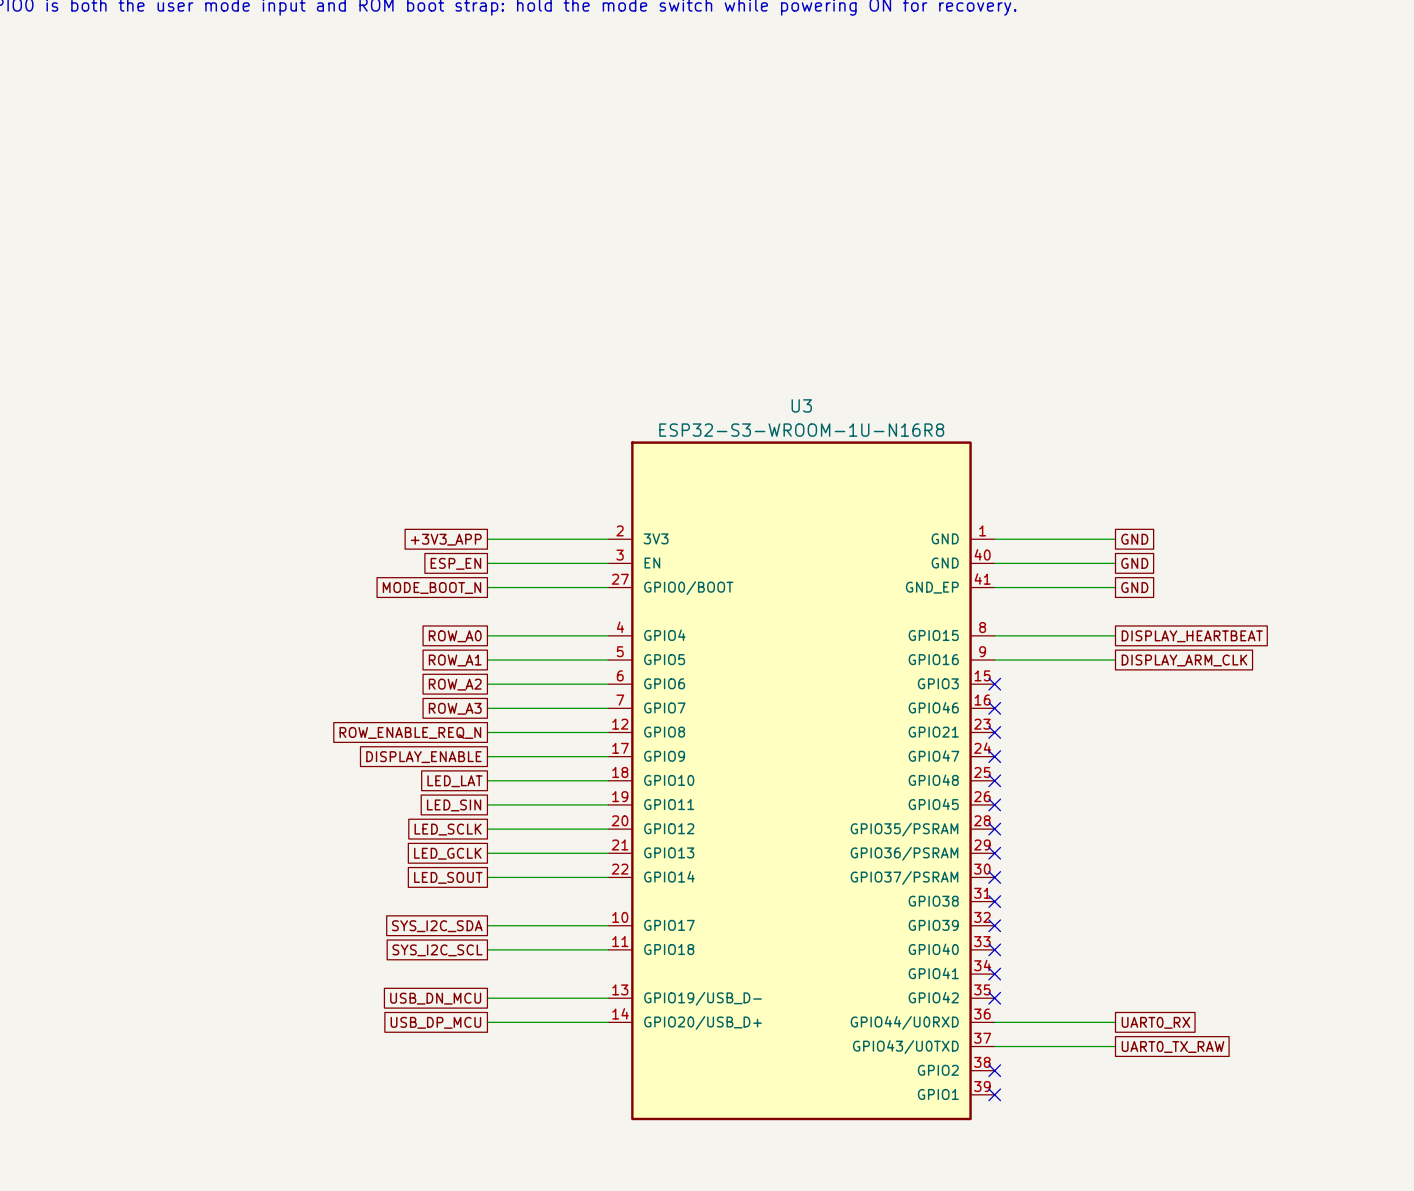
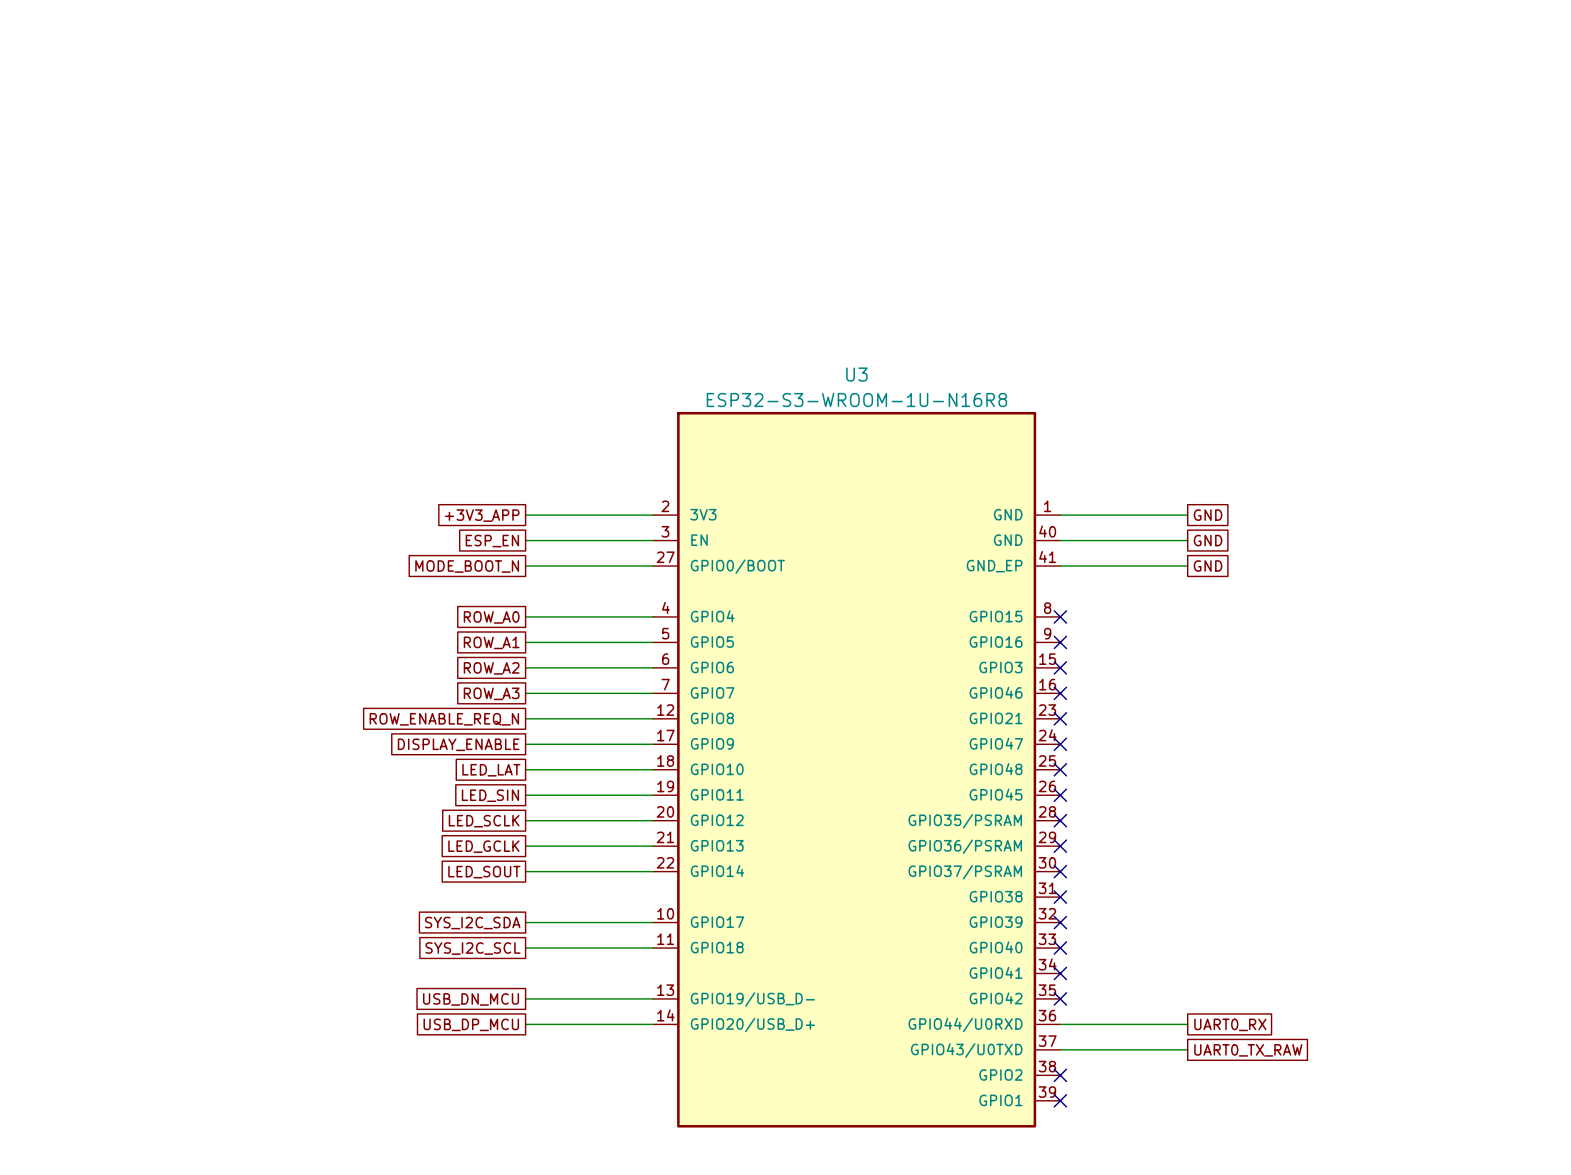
wire: (994, 635) (1115, 635) -> none
no-connect mark: none -> (1060, 616)
global label: DISPLAY_HEARTBEAT (1192, 636) -> none
wire: (994, 660) (1115, 660) -> none
no-connect mark: none -> (1060, 642)
global label: DISPLAY_ARM_CLK (1184, 660) -> none

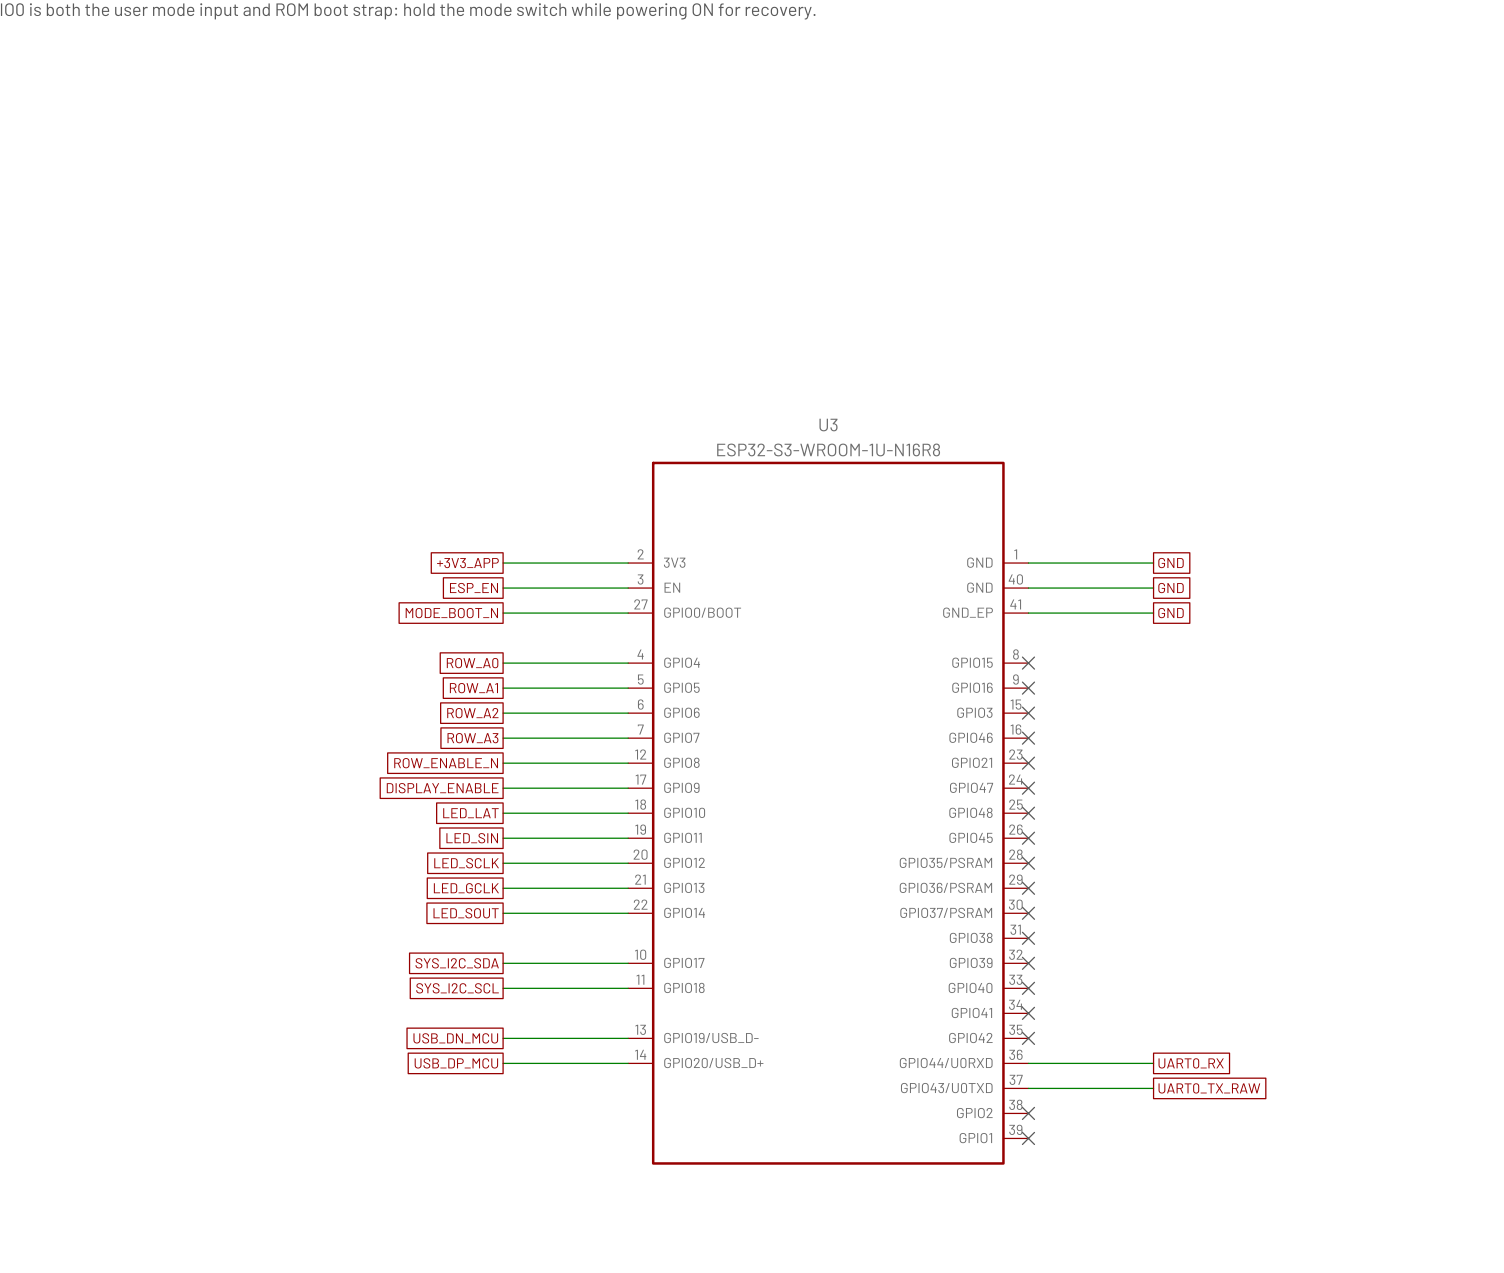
global label: ROW_ENABLE_REQ_N (444, 719) -> ROW_ENABLE_N (446, 763)

